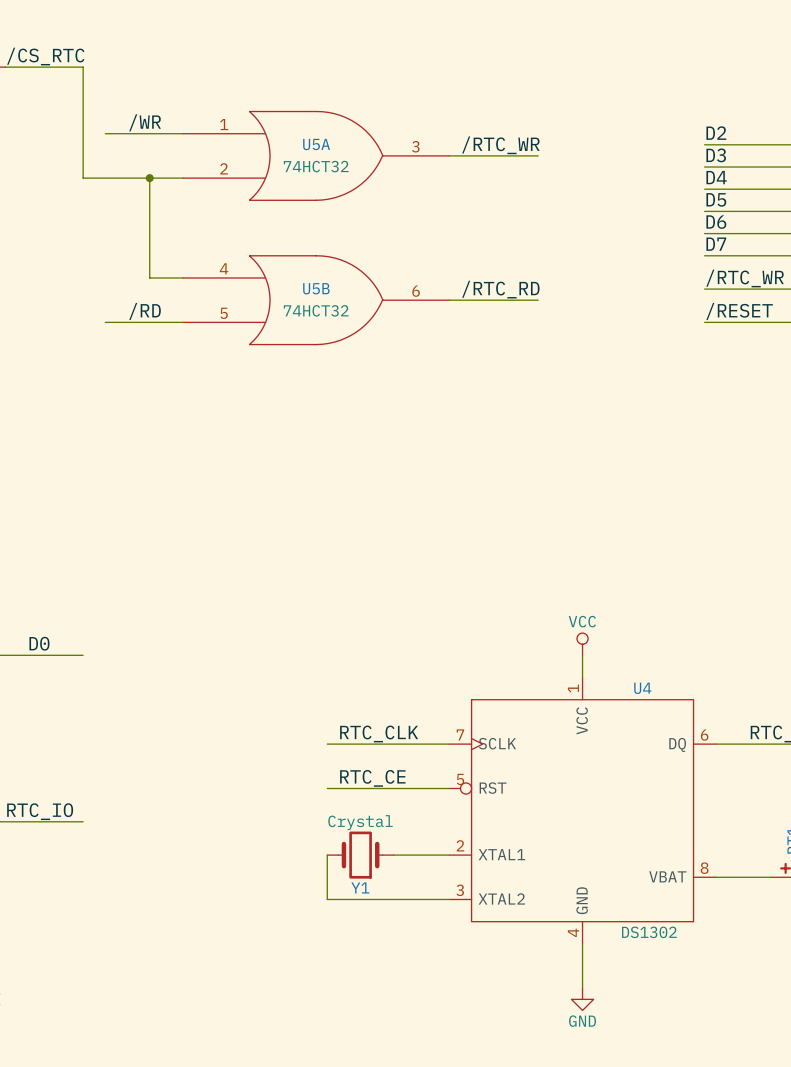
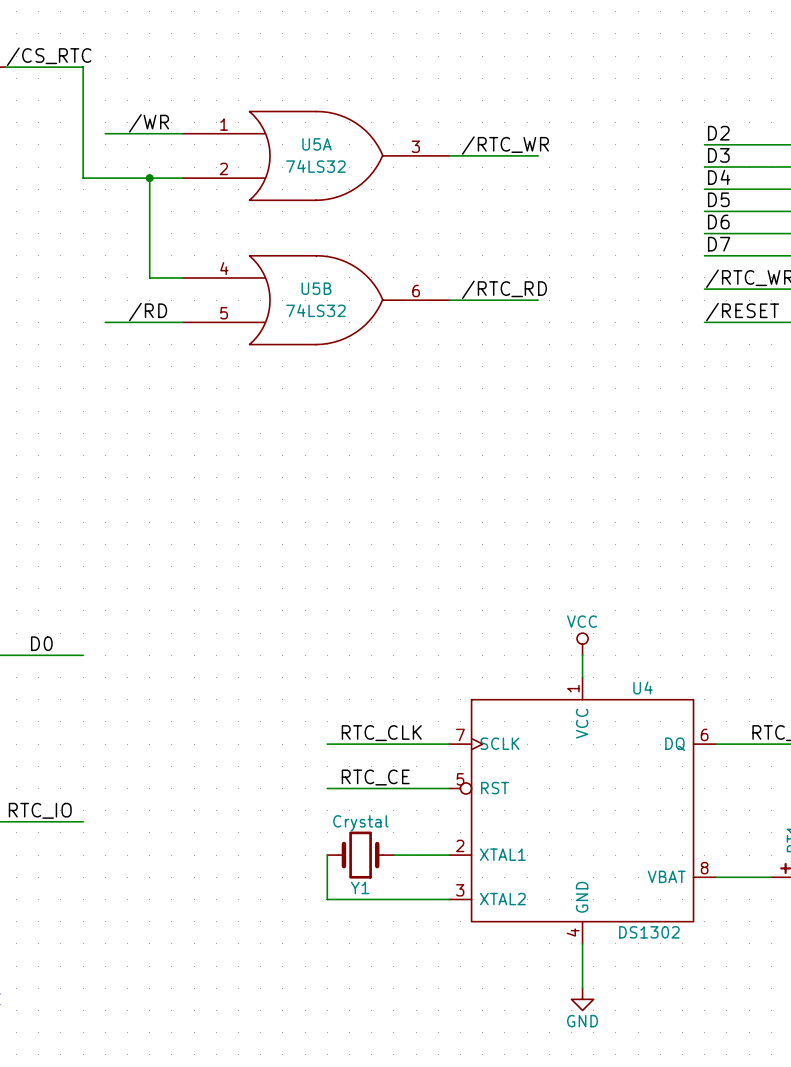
U5A value: 74HCT32 (316, 166) -> 74LS32 (315, 166)
U5B value: 74HCT32 (316, 310) -> 74LS32 (315, 310)

